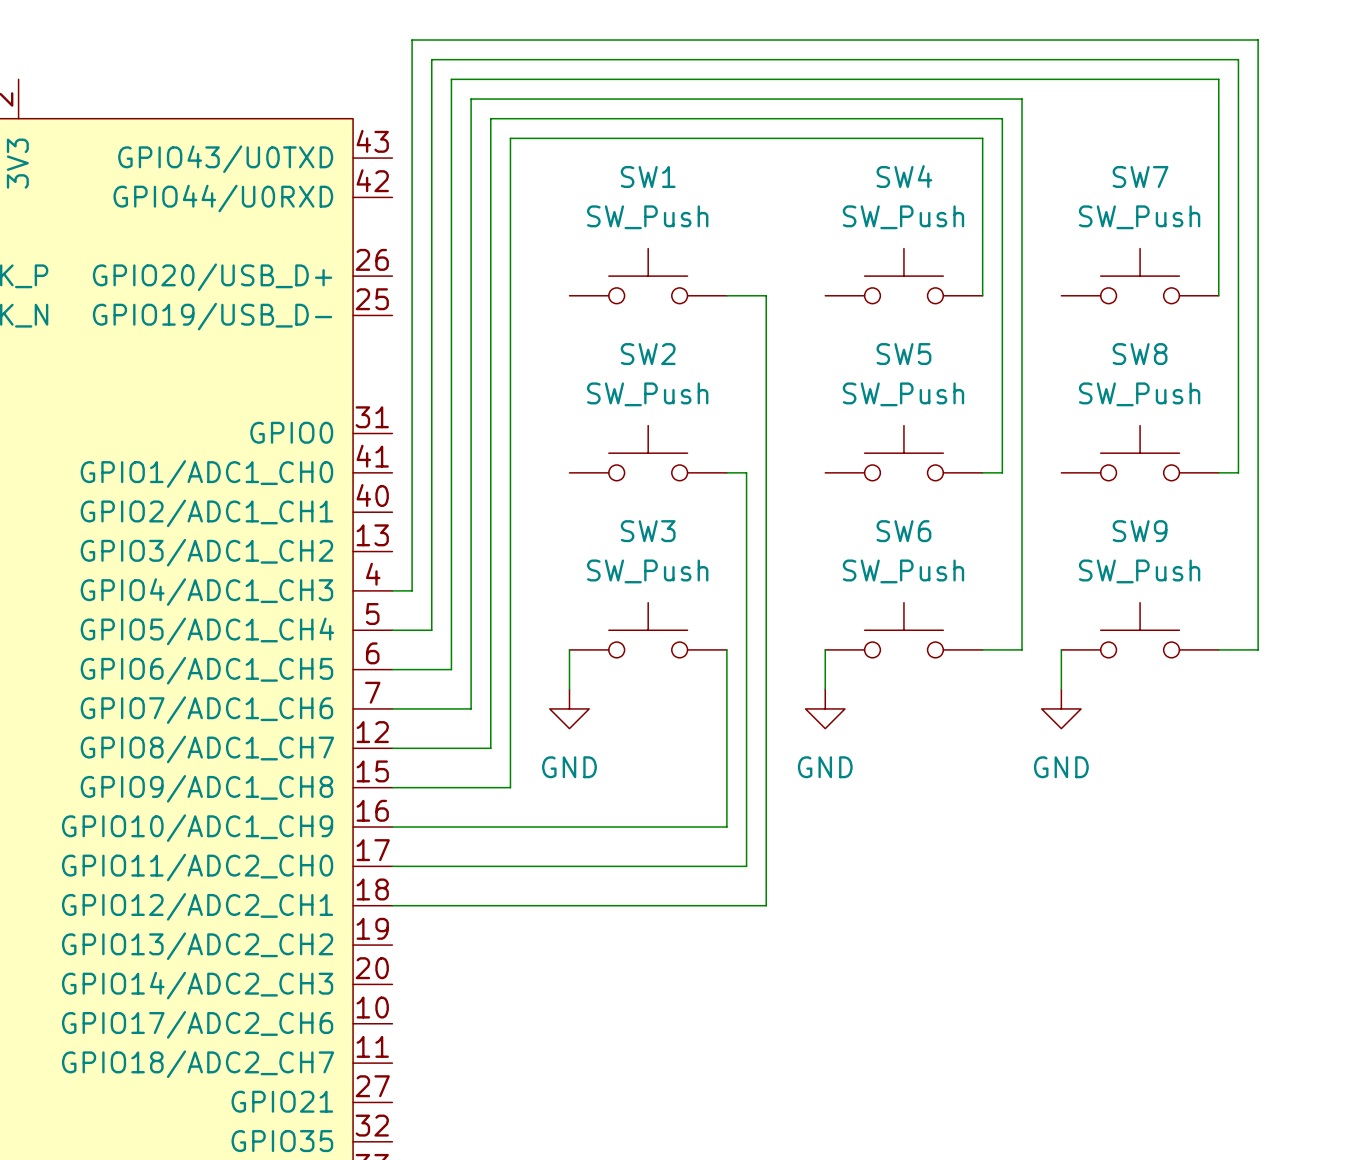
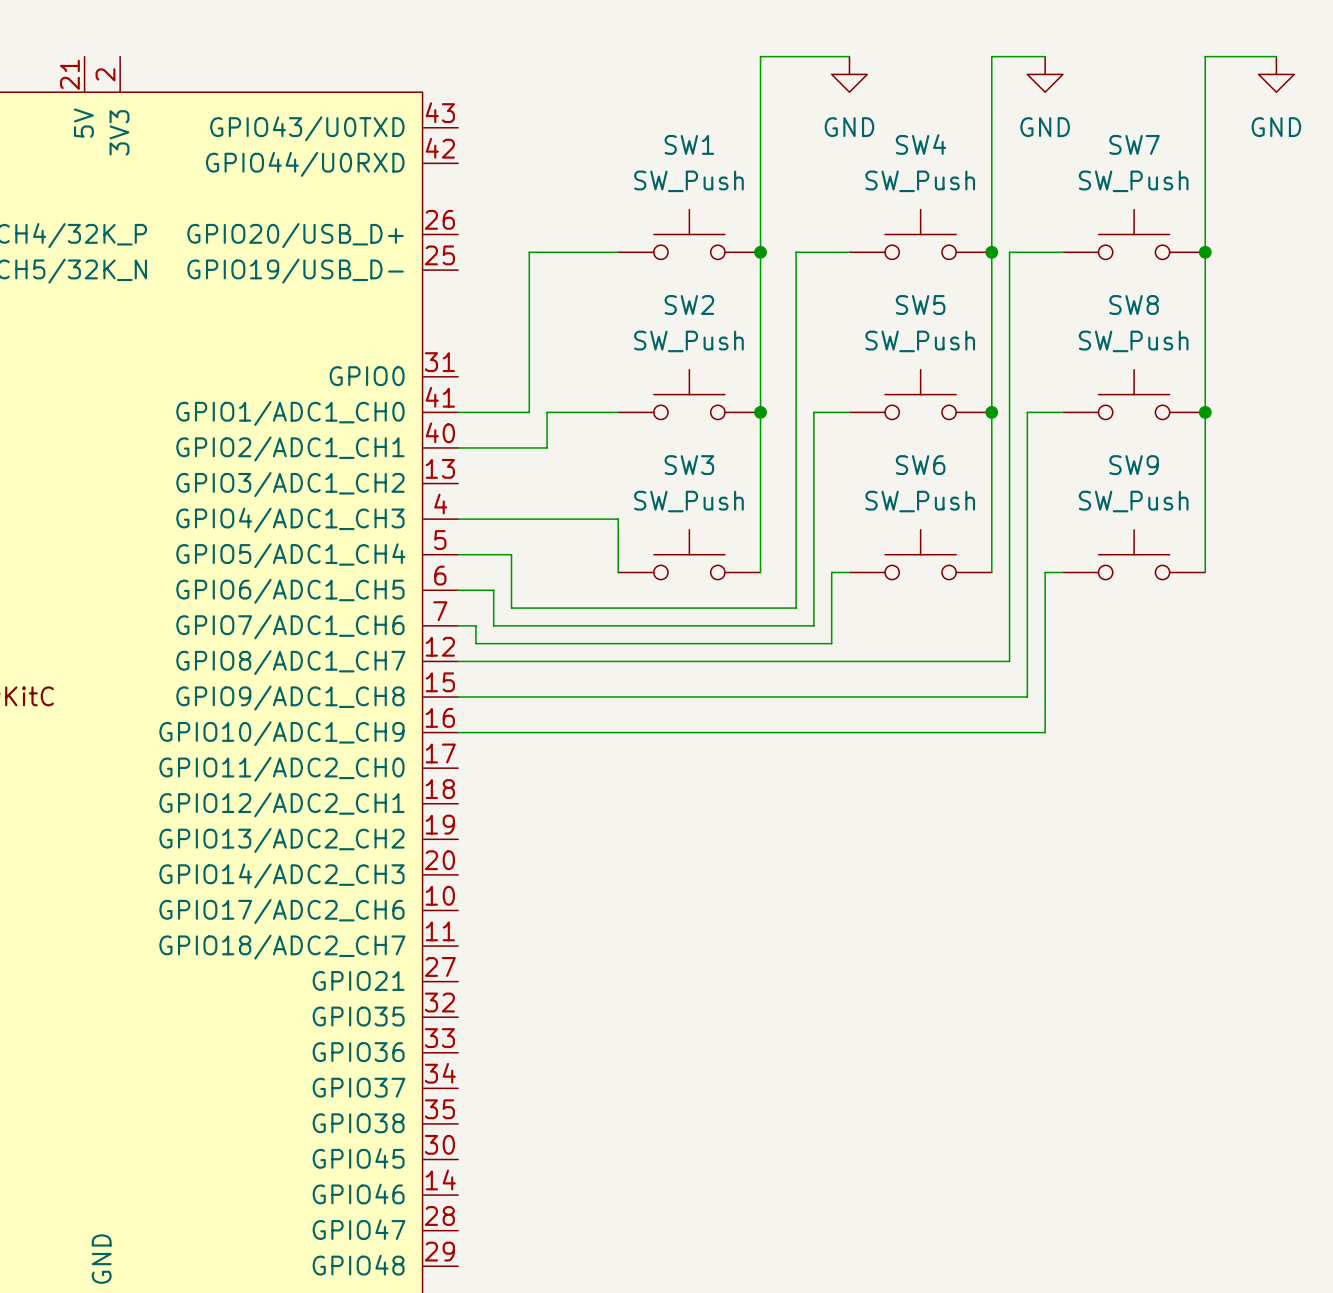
wire: (726, 79) (451, 79) (451, 630) -> (760, 56) (760, 572)
wire: (825, 79) (982, 79) -> (991, 109) (991, 56)
wire: (1041, 79) (1218, 79) -> (1276, 56) (1205, 56)
power symbol: none -> GND (849, 74)
power symbol: none -> GND (1045, 74)
power symbol: none -> GND (1276, 74)
wire: (982, 138) (510, 138) (510, 787) -> (1027, 572) (1027, 697) (564, 697)
wire: (471, 295) (471, 99) (1022, 99) (1022, 472) -> (529, 252) (618, 252)
wire: (726, 295) (766, 295) -> (849, 252) (796, 252)
junction: none -> (760, 252)
junction: none -> (991, 252)
wire: (1002, 295) (1002, 118) (490, 118) (490, 472) -> (618, 412) (547, 412)
wire: none -> (1009, 252) (1062, 252)
junction: none -> (1205, 252)
wire: (471, 472) (471, 708) -> (529, 412) (458, 412)
wire: (726, 472) (746, 472) (746, 866) (392, 866) -> none
junction: none -> (760, 412)
wire: none -> (849, 412) (813, 412) (813, 625) (529, 625)
wire: (982, 472) (1002, 472) -> (547, 661) (1009, 661) (1009, 412)
junction: none -> (991, 412)
wire: none -> (1027, 412) (1062, 412)
wire: (1218, 472) (1238, 472) (1238, 59) (431, 59) (431, 630) -> (511, 554) (493, 554)
junction: none -> (1205, 412)
wire: (490, 512) (490, 748) -> (547, 447) (458, 447)
wire: (412, 590) (412, 40) (1258, 40) (1258, 649) (1218, 649) -> (1205, 252) (1205, 572)
wire: (569, 649) (569, 689) -> (618, 572) (618, 519) (475, 519)
wire: (726, 649) (726, 827) -> (1062, 572) (1045, 572) (1045, 732) (760, 732)
wire: (825, 649) (825, 689) -> none
wire: (982, 649) (1022, 649) -> (991, 572) (991, 252)
wire: (1061, 649) (1061, 689) -> none
wire: (431, 669) (451, 669) -> (493, 590) (493, 625)
wire: (766, 689) (766, 905) (392, 905) -> (796, 608) (511, 608) (511, 590)
wire: (412, 708) (431, 708) -> (475, 625) (475, 643) (831, 643) (831, 572) (849, 572)
power symbol: GND (569, 708) -> none
power symbol: GND (825, 708) -> none
power symbol: GND (1061, 708) -> none

